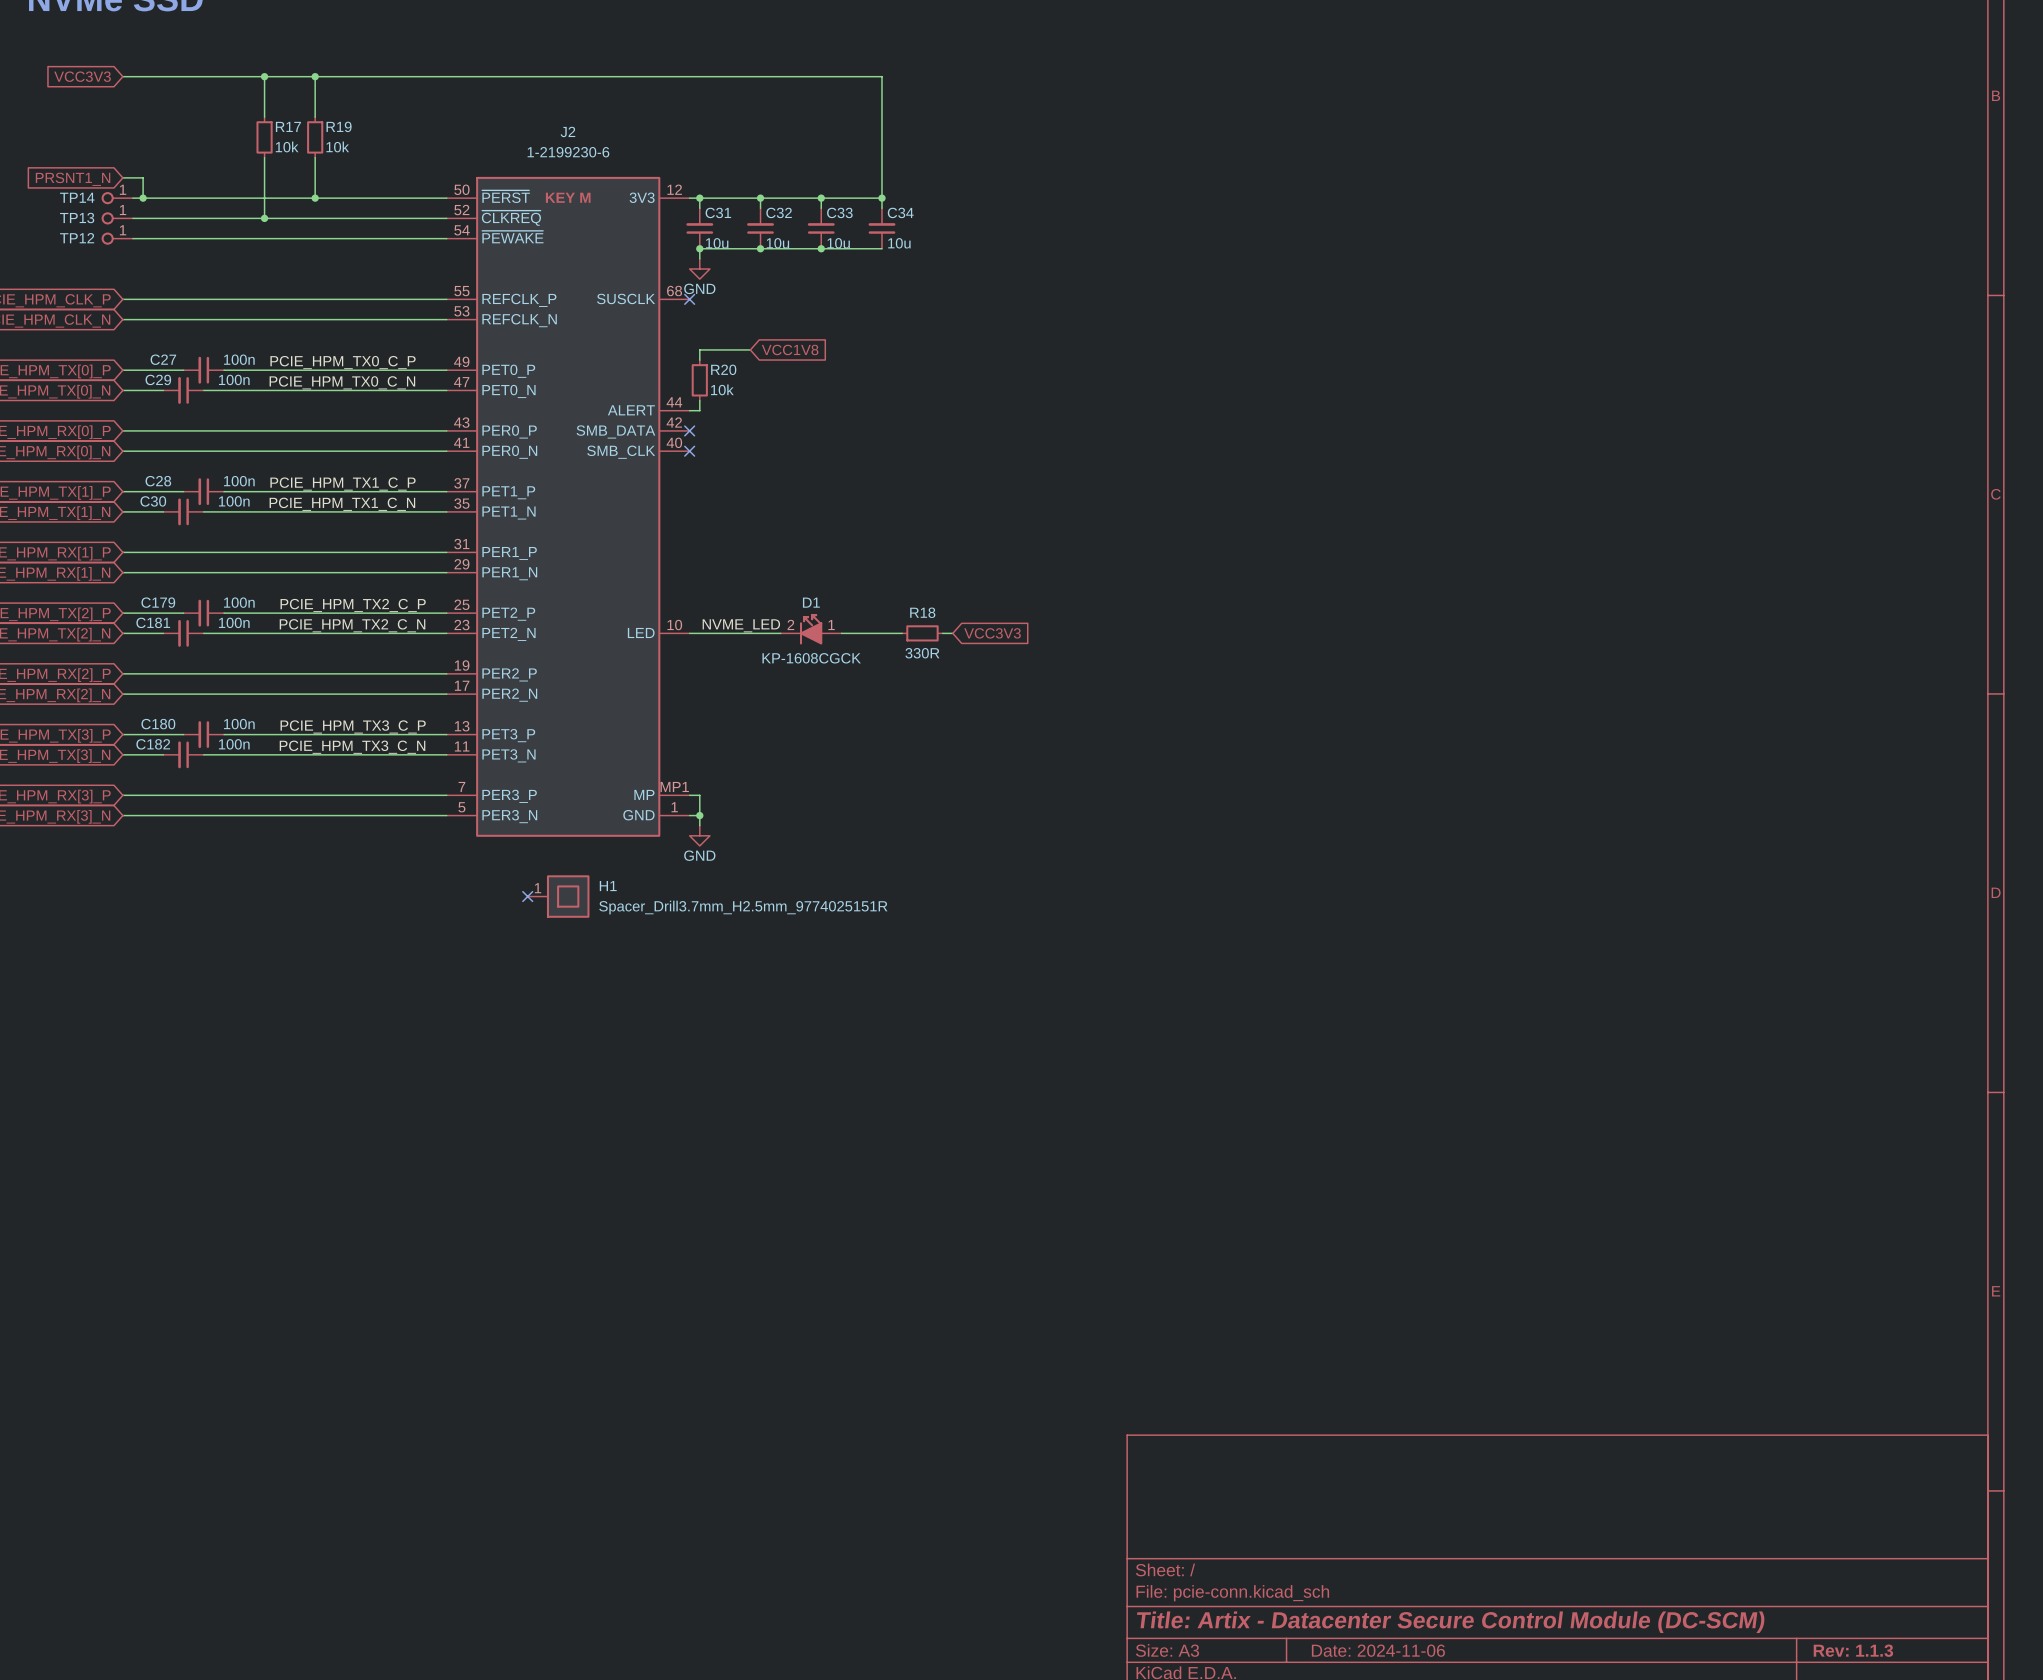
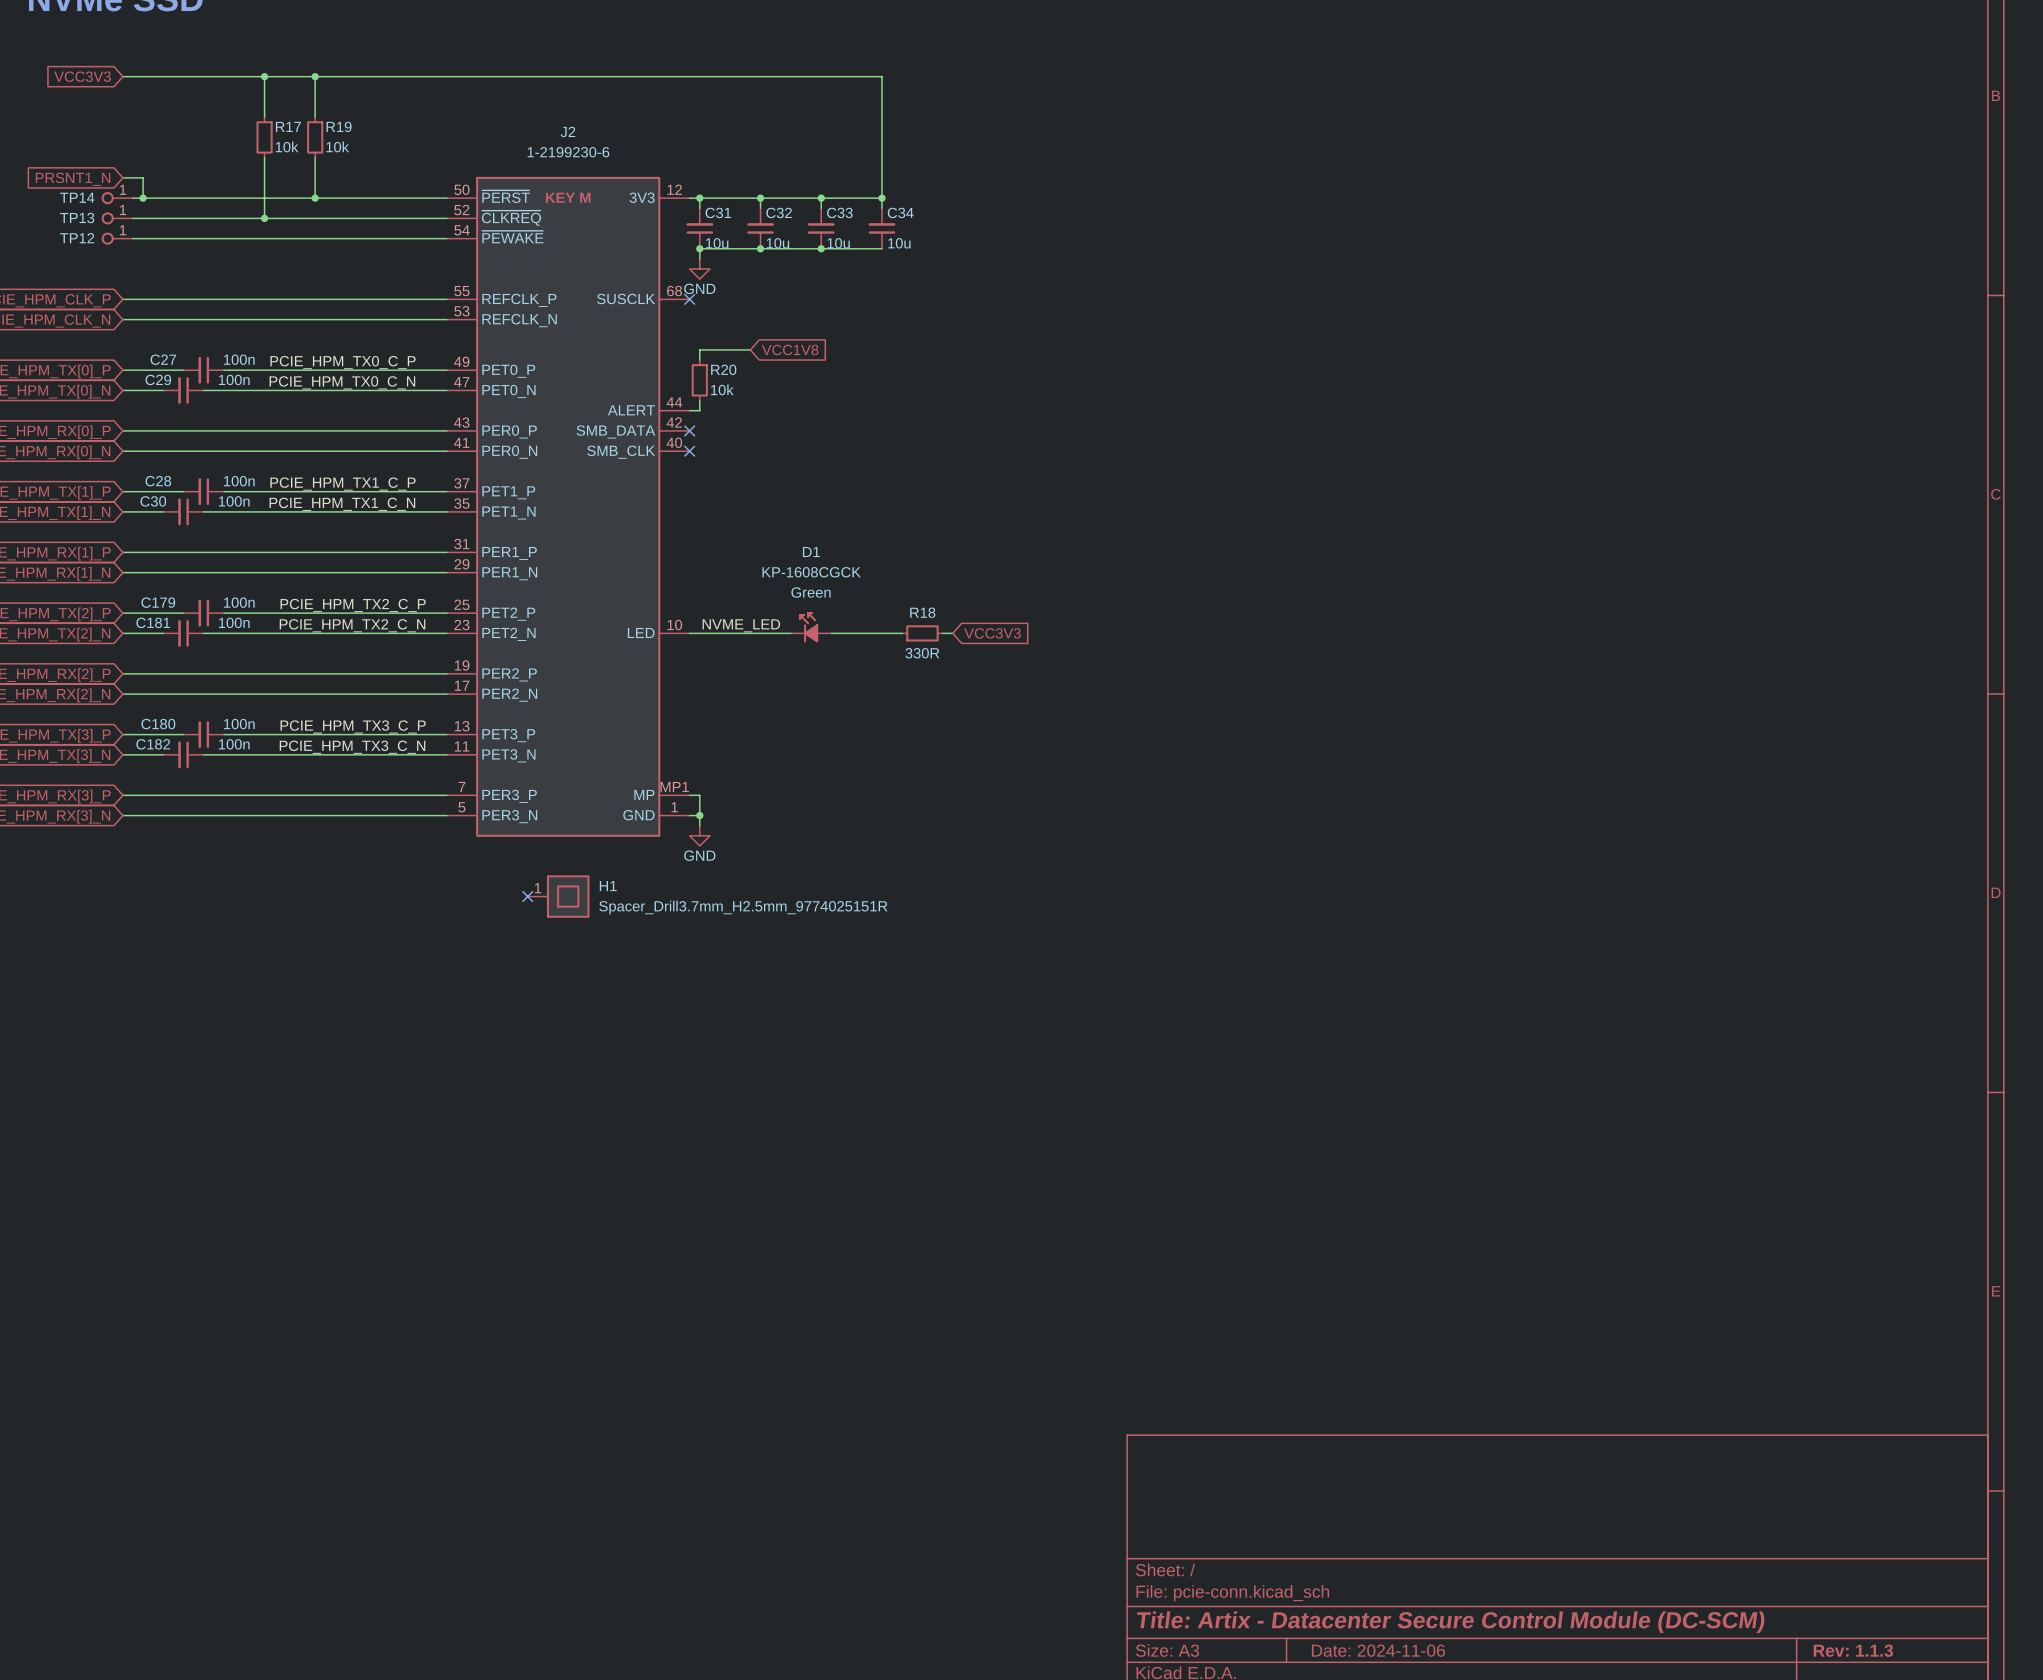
D1 text: none -> Green (811, 592)
D1 name position: D1 (811, 602) -> D1 (811, 552)
D1 symbol: [780, 614, 842, 645] -> [790, 612, 832, 643]
D1 text position: KP-1608CGCK (811, 658) -> KP-1608CGCK (811, 572)

